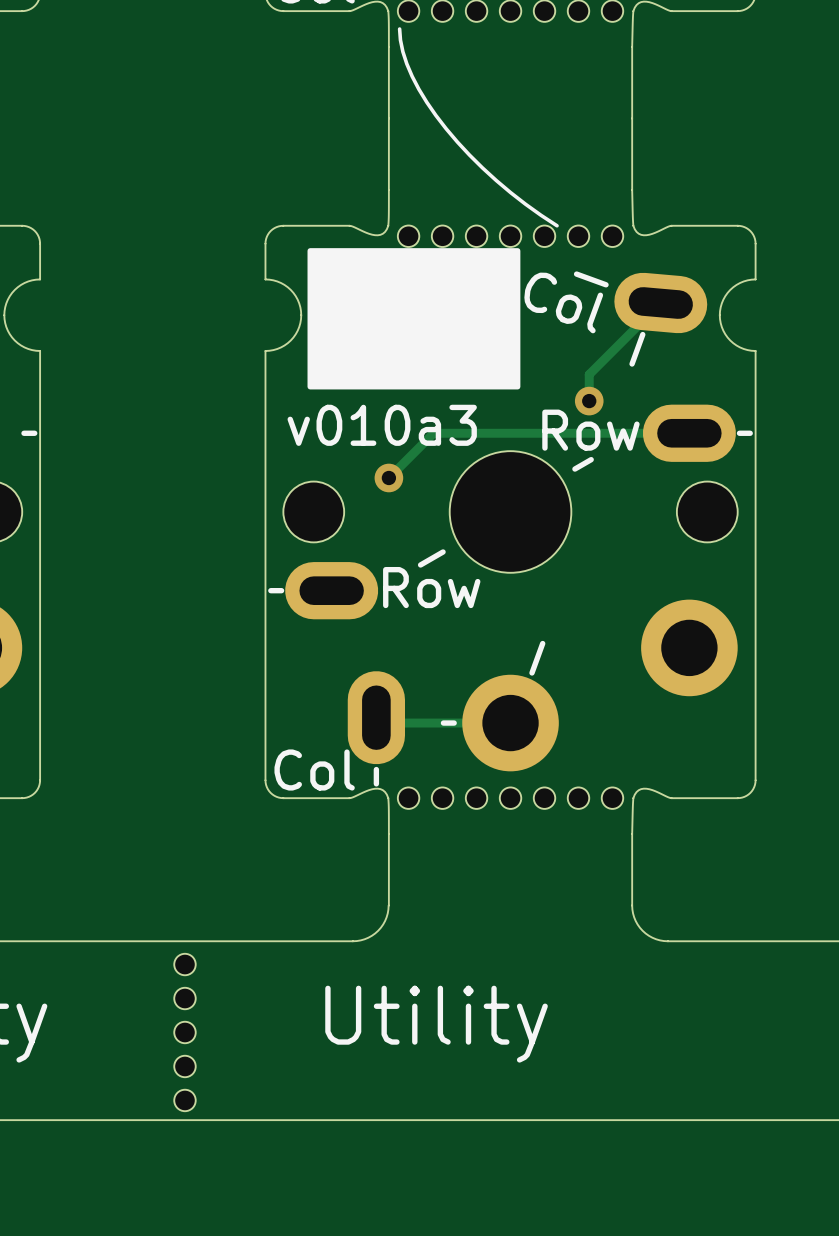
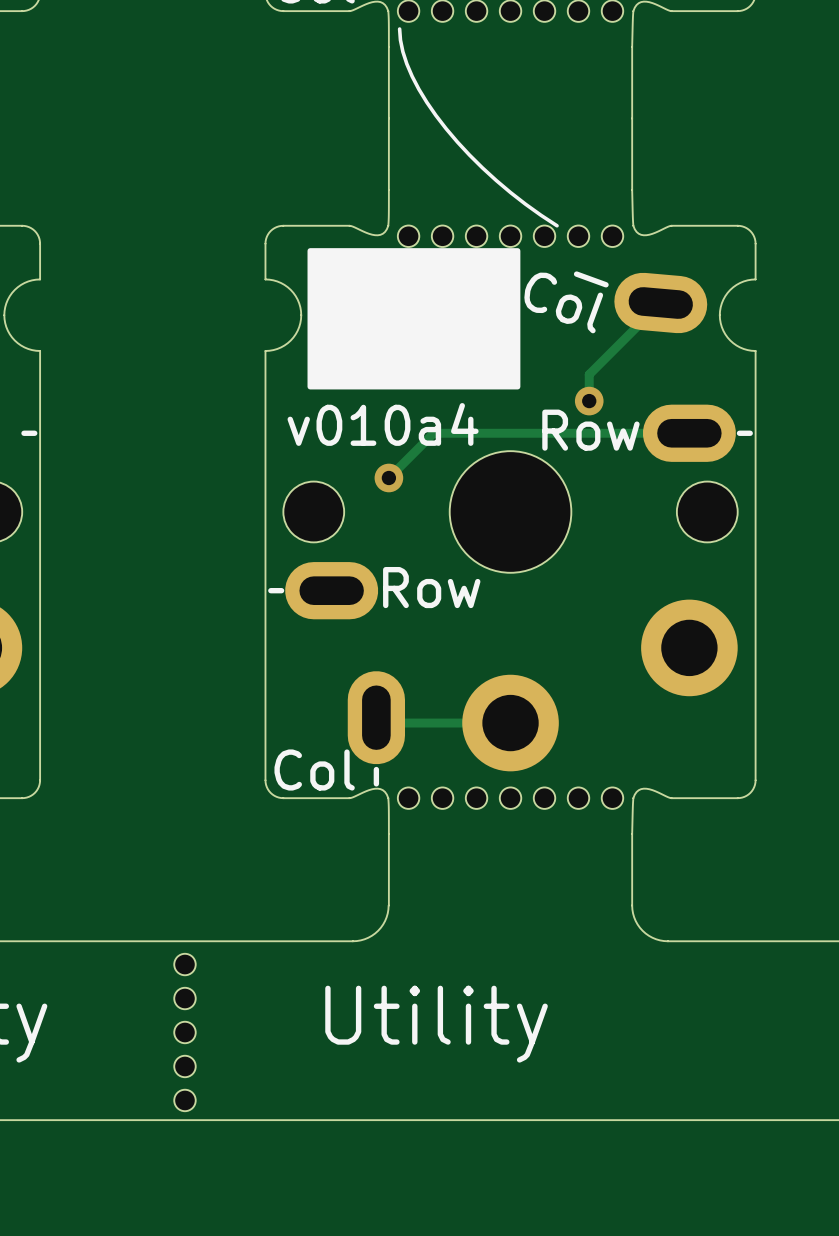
line: (642, 334) (632, 363) -> none
text: v010a3 (382, 425) -> v010a4 (383, 424)
line: (591, 459) (574, 469) -> none
line: (443, 552) (420, 564) -> none
line: (542, 643) (531, 672) -> none
line: (454, 723) (443, 723) -> none

